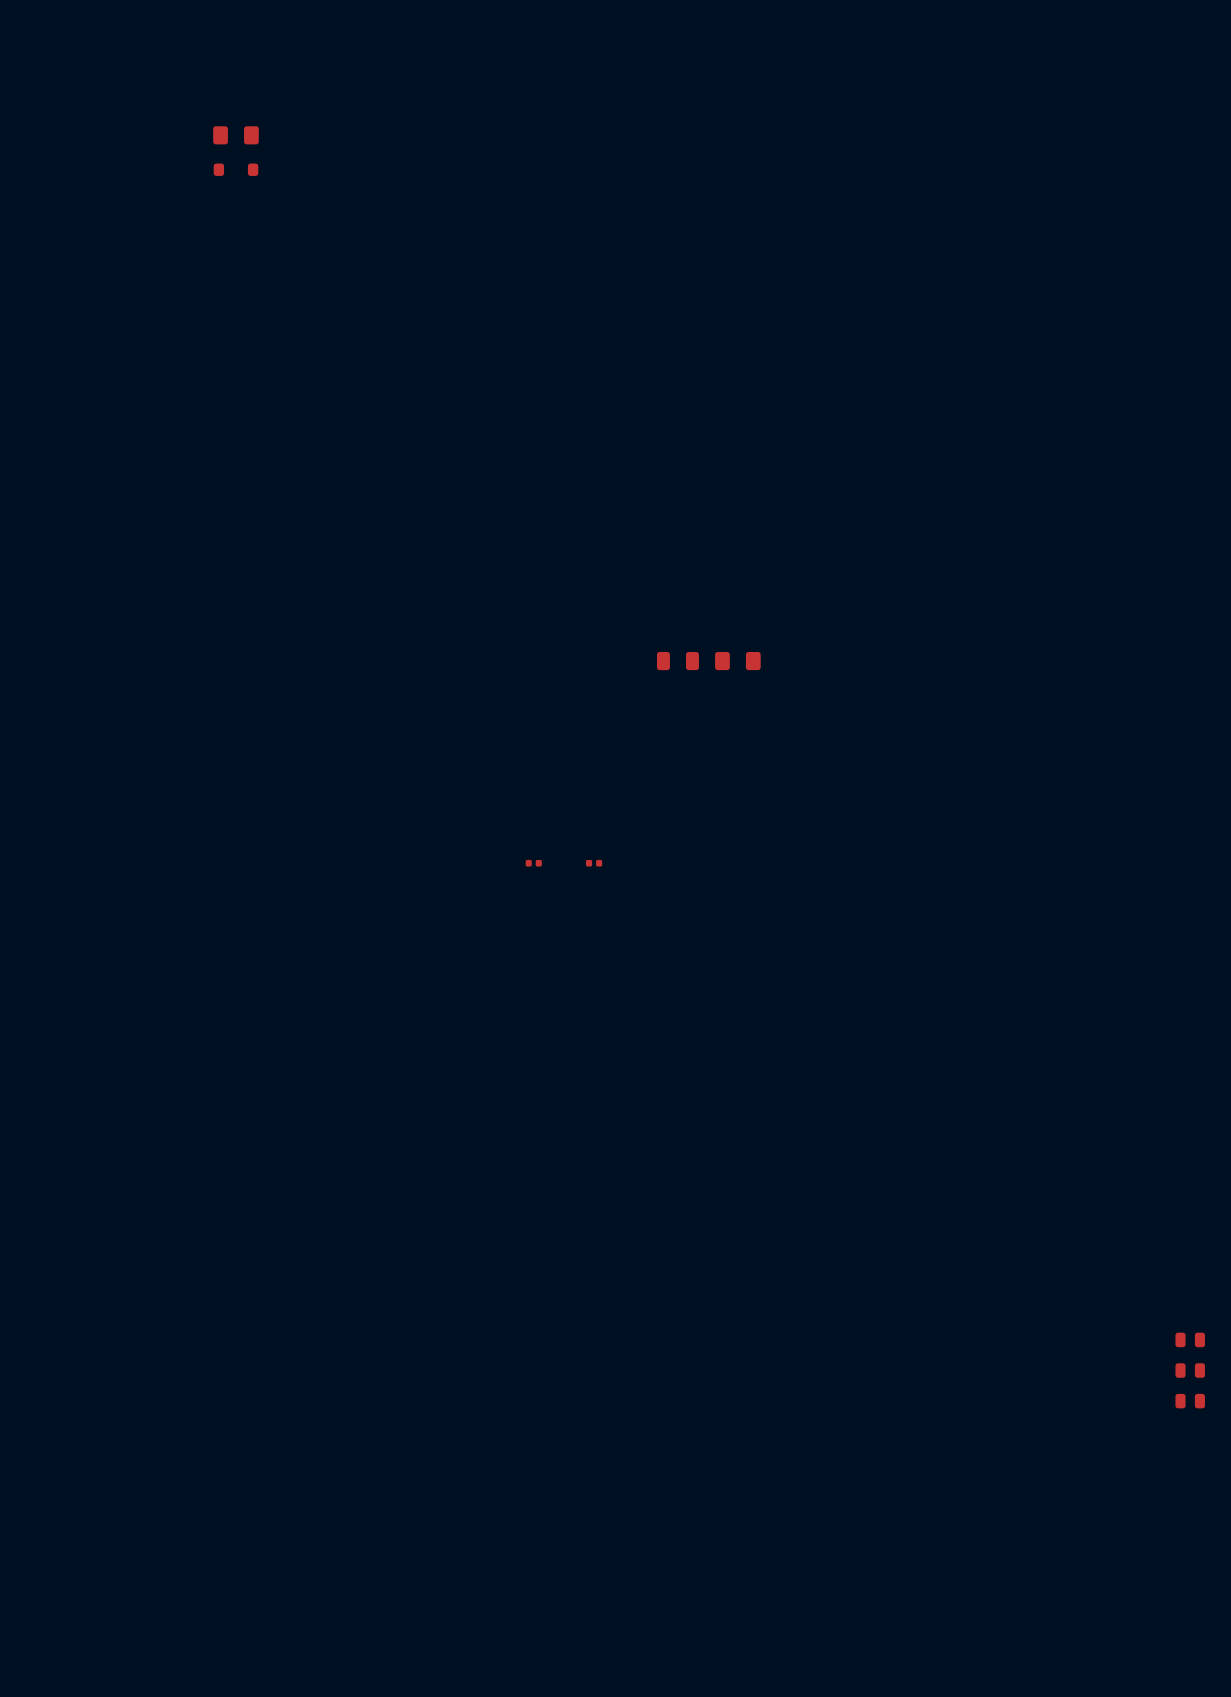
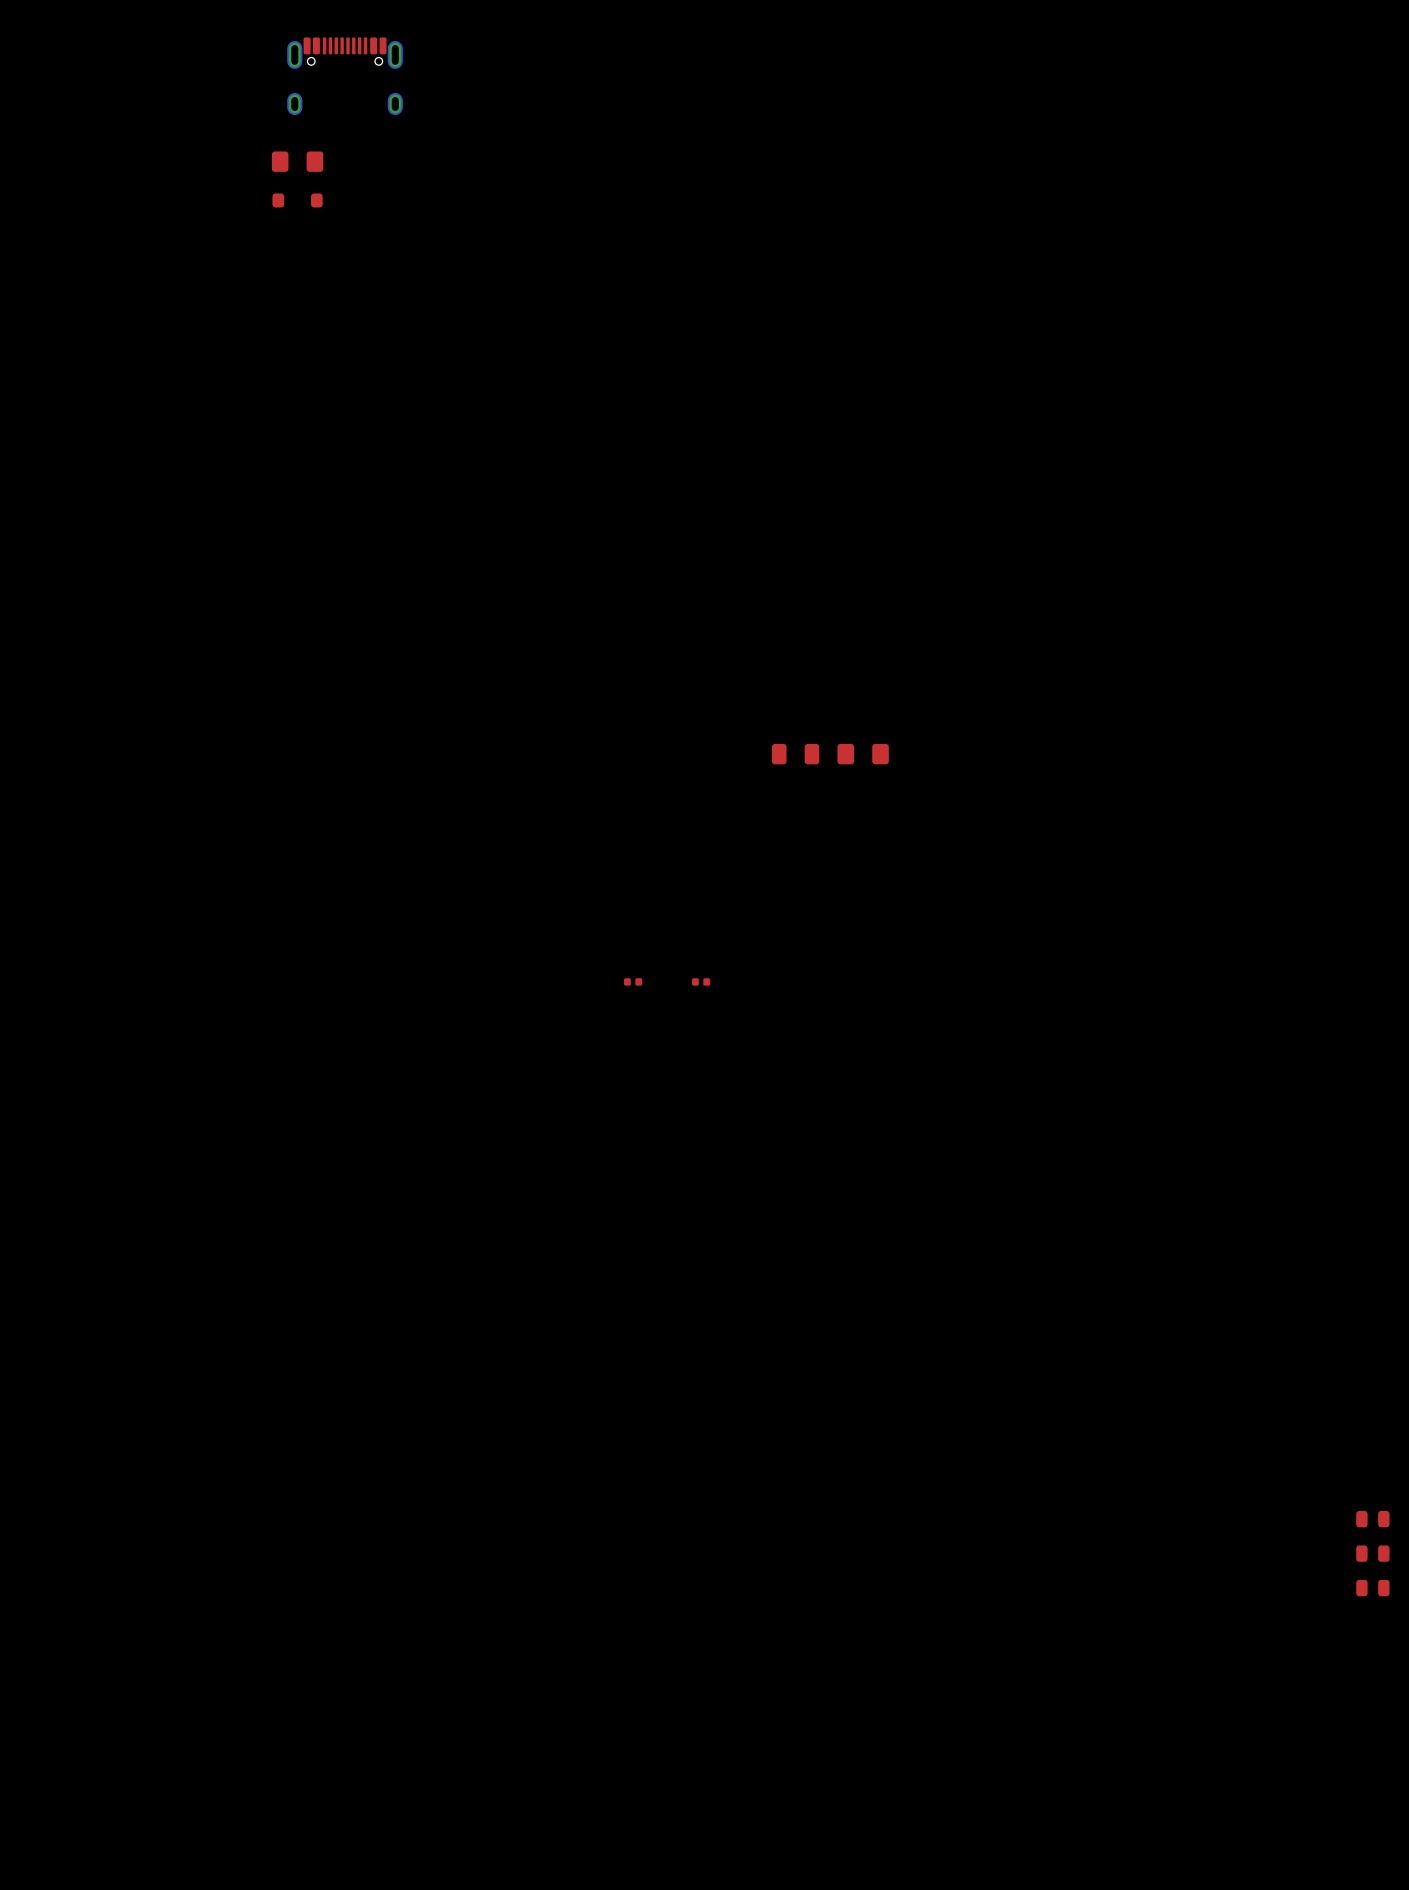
part: none -> (345, 76)

